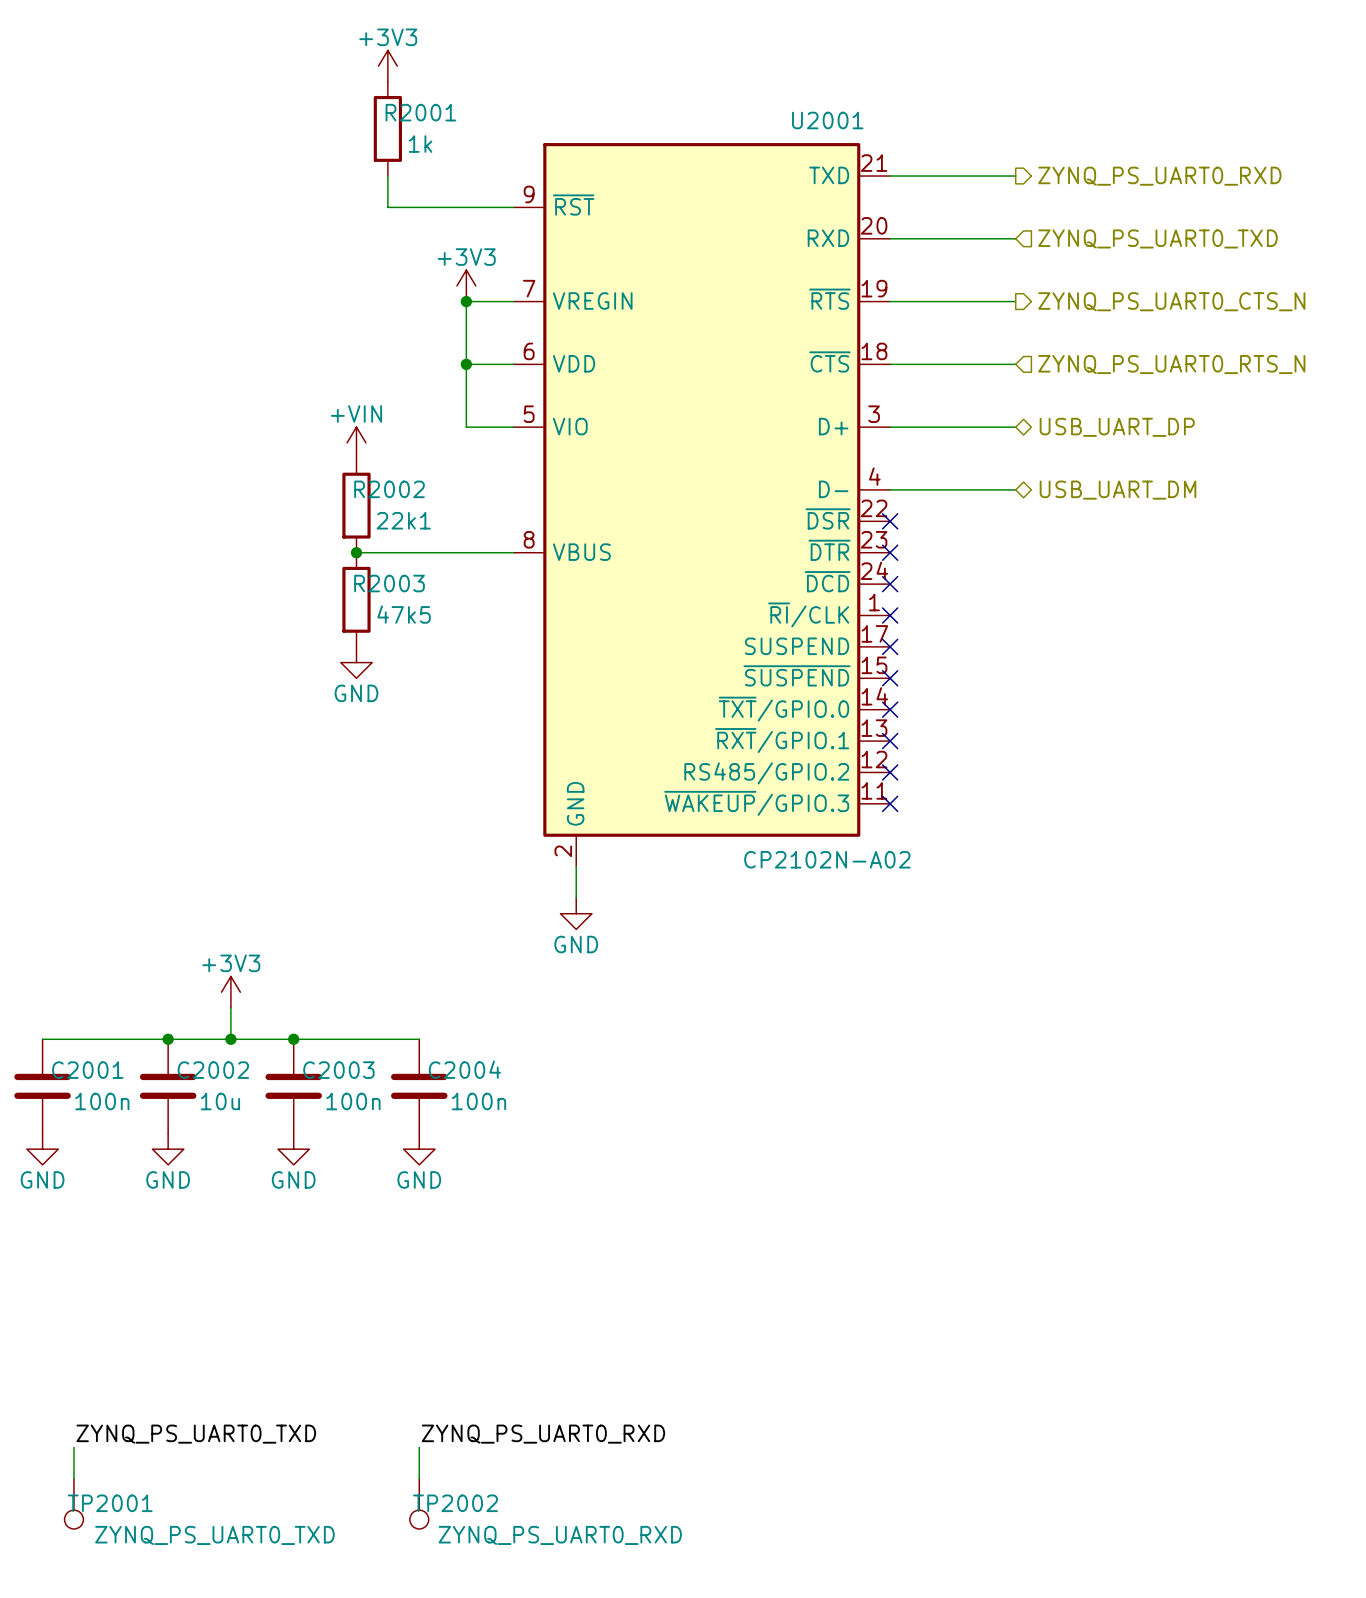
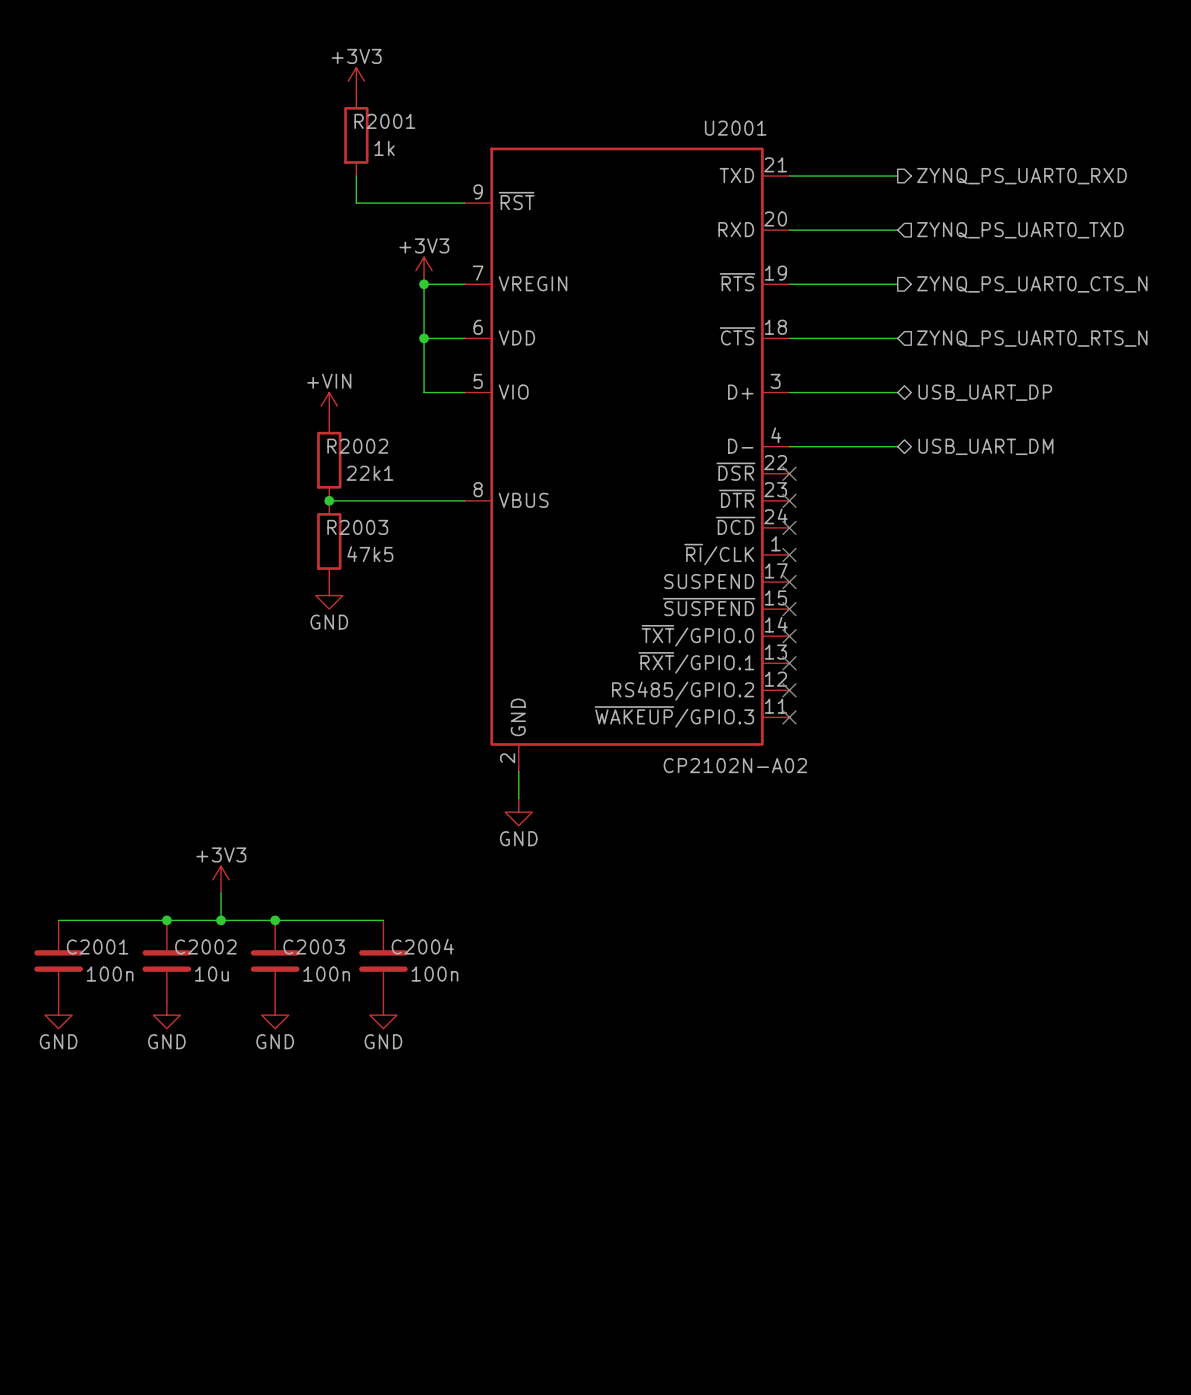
label: ZYNQ_PS_UART0_TXD (196, 1434) -> none
label: ZYNQ_PS_UART0_RXD (543, 1434) -> none
wire: (73, 1447) (73, 1478) -> none
wire: (419, 1447) (419, 1478) -> none
TP2001: ZYNQ_PS_UART0_TXD (73, 1503) -> none
TP2002: ZYNQ_PS_UART0_RXD (419, 1503) -> none

